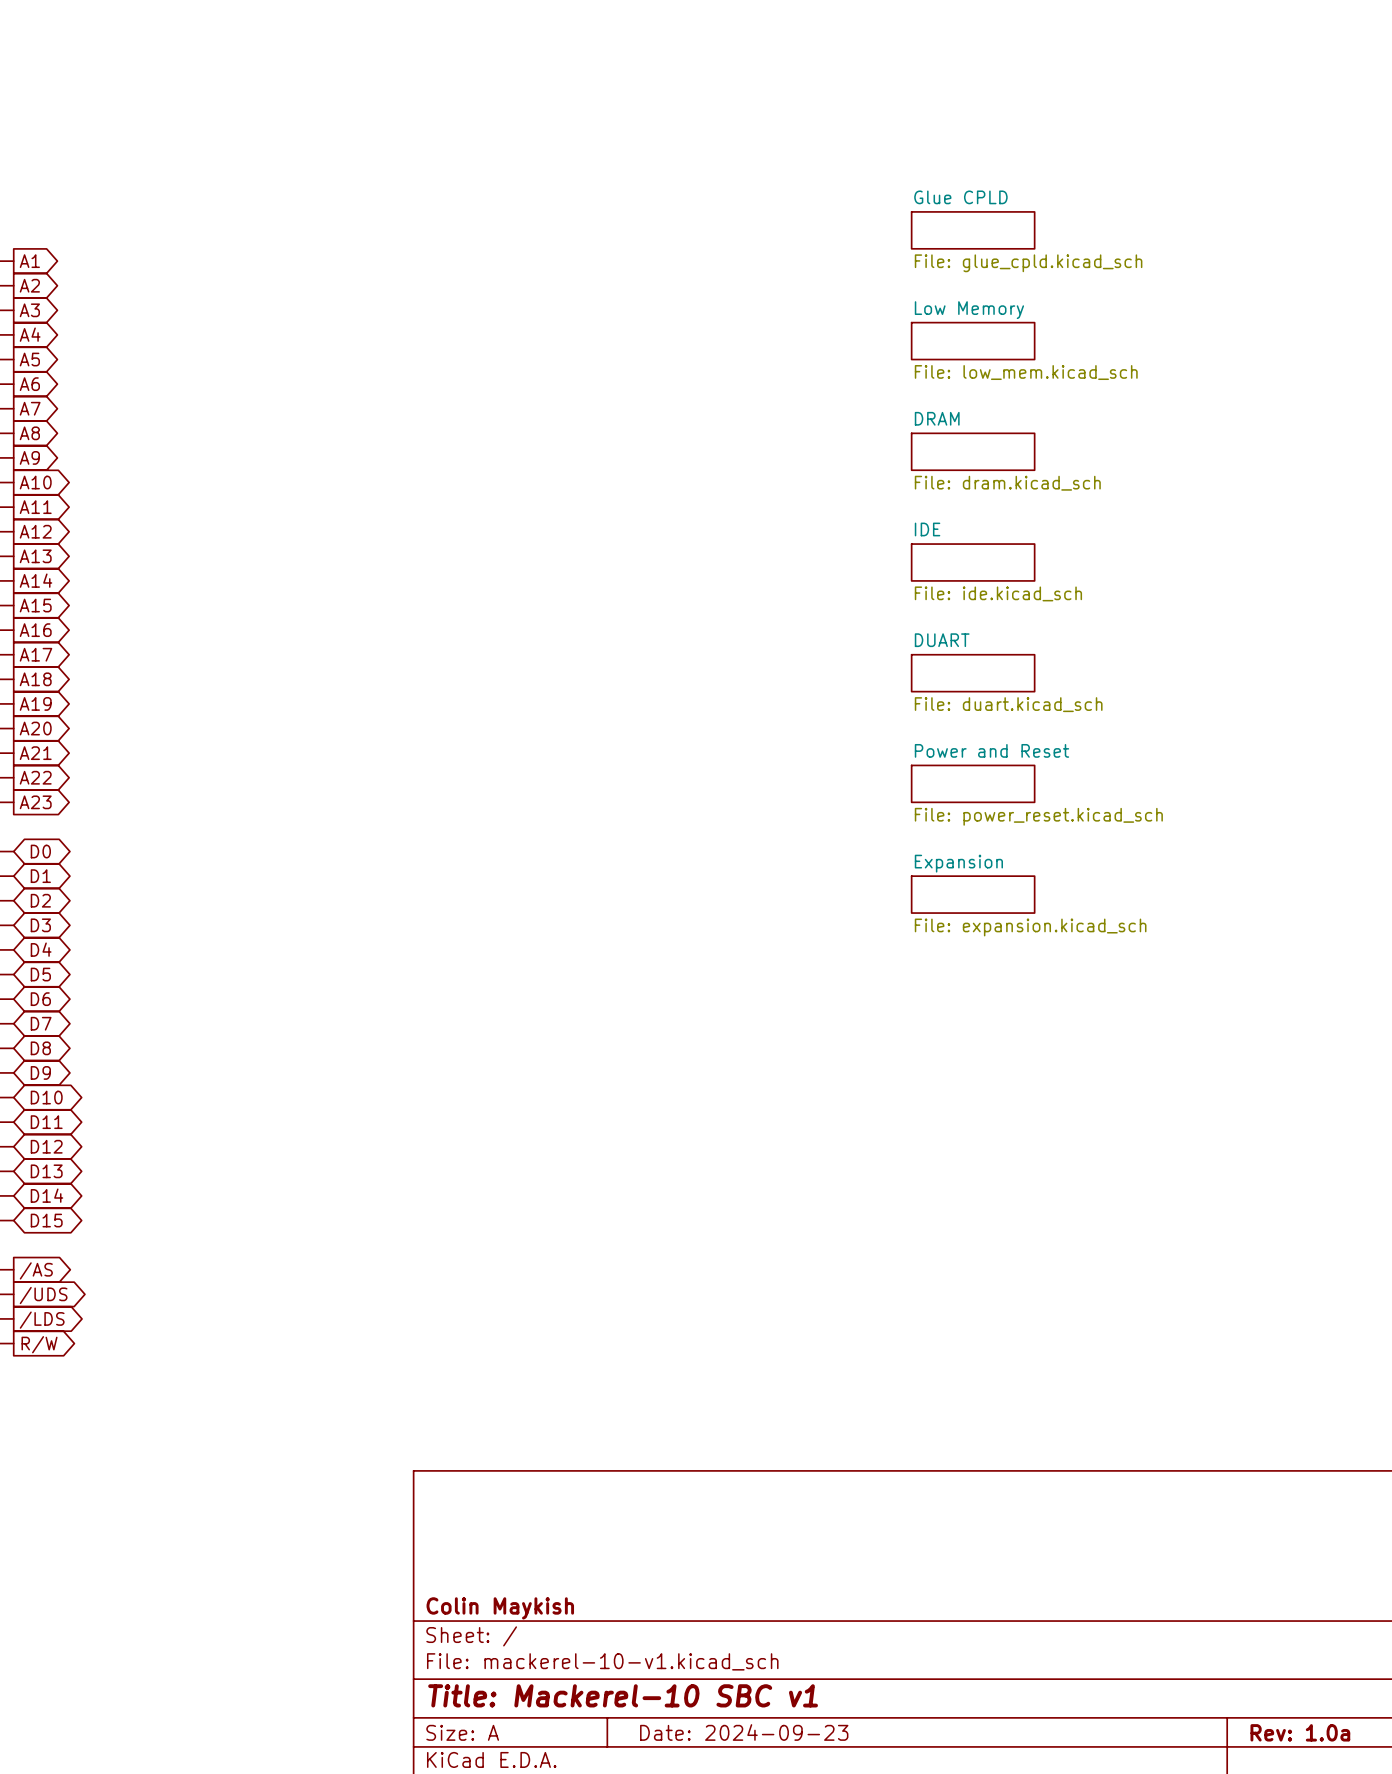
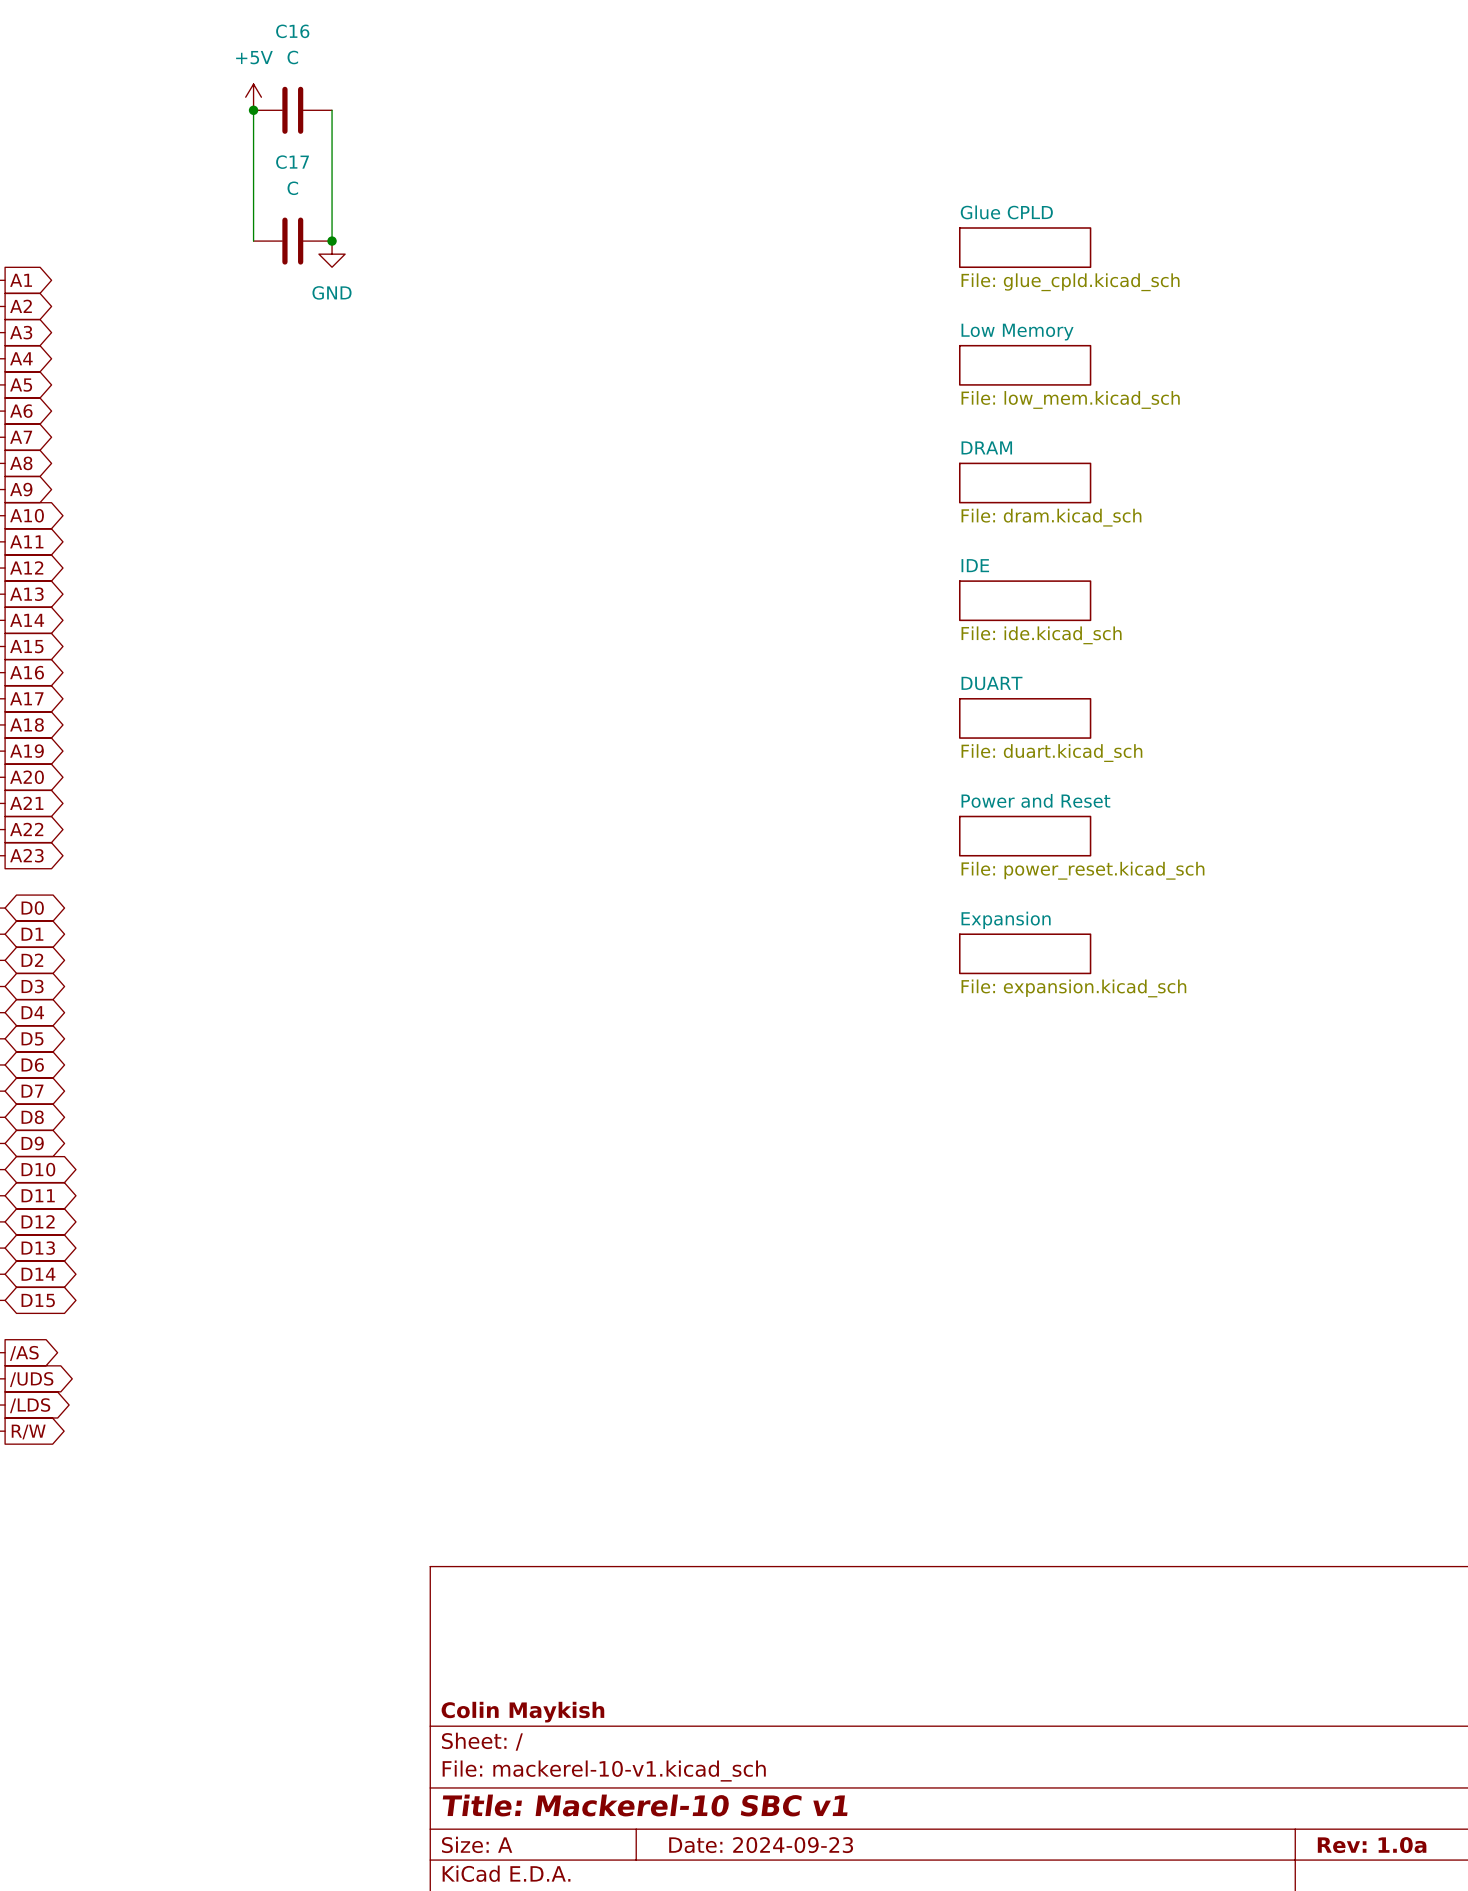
power symbol: none -> +5V (253, 97)
wire: none -> (253, 110) (253, 241)
junction: none -> (253, 110)
C16: none -> C (292, 110)
wire: none -> (332, 110) (332, 241)
C17: none -> C (292, 241)
junction: none -> (332, 241)
power symbol: none -> GND (332, 254)

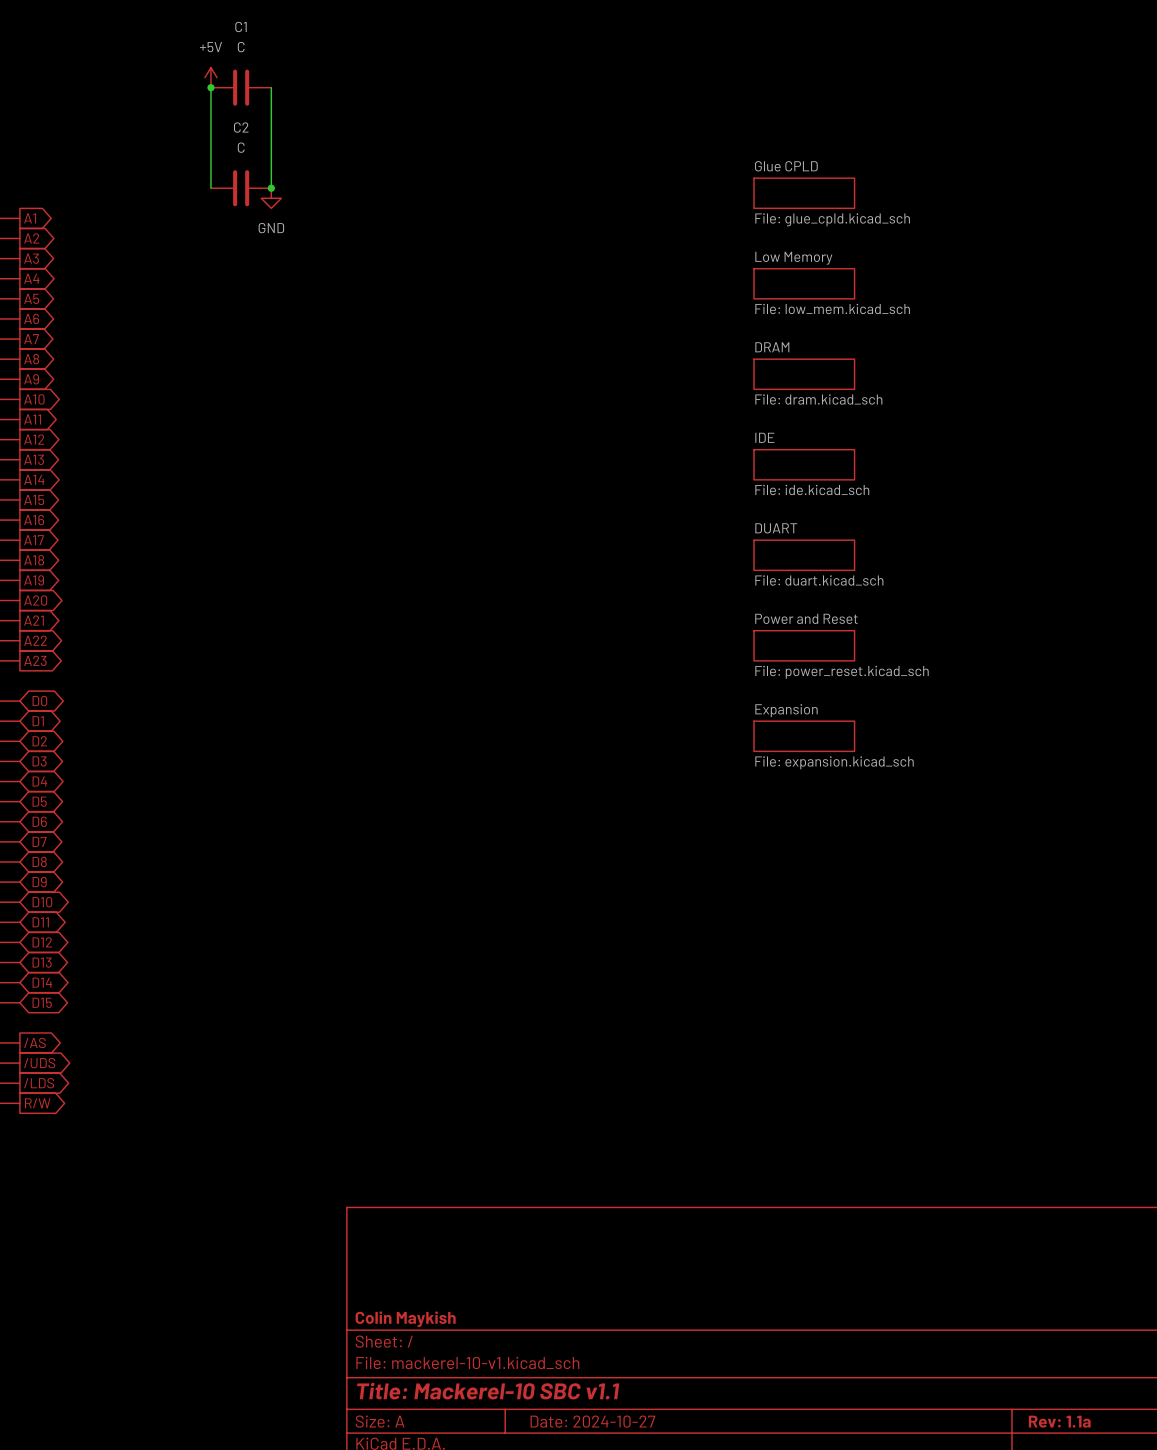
C16 name: C16 (292, 31) -> C1 (241, 26)
C17 name: C17 (292, 162) -> C2 (241, 127)
title block: Title: Mackerel-10 SBC v1 (645, 1805) -> Title: Mackerel-10 SBC v1.1 (488, 1391)
title block: Date: 2024-09-23 (761, 1845) -> Date: 2024-10-27 (592, 1421)
title block: Rev: 1.0a (1372, 1845) -> Rev: 1.1a (1059, 1421)

